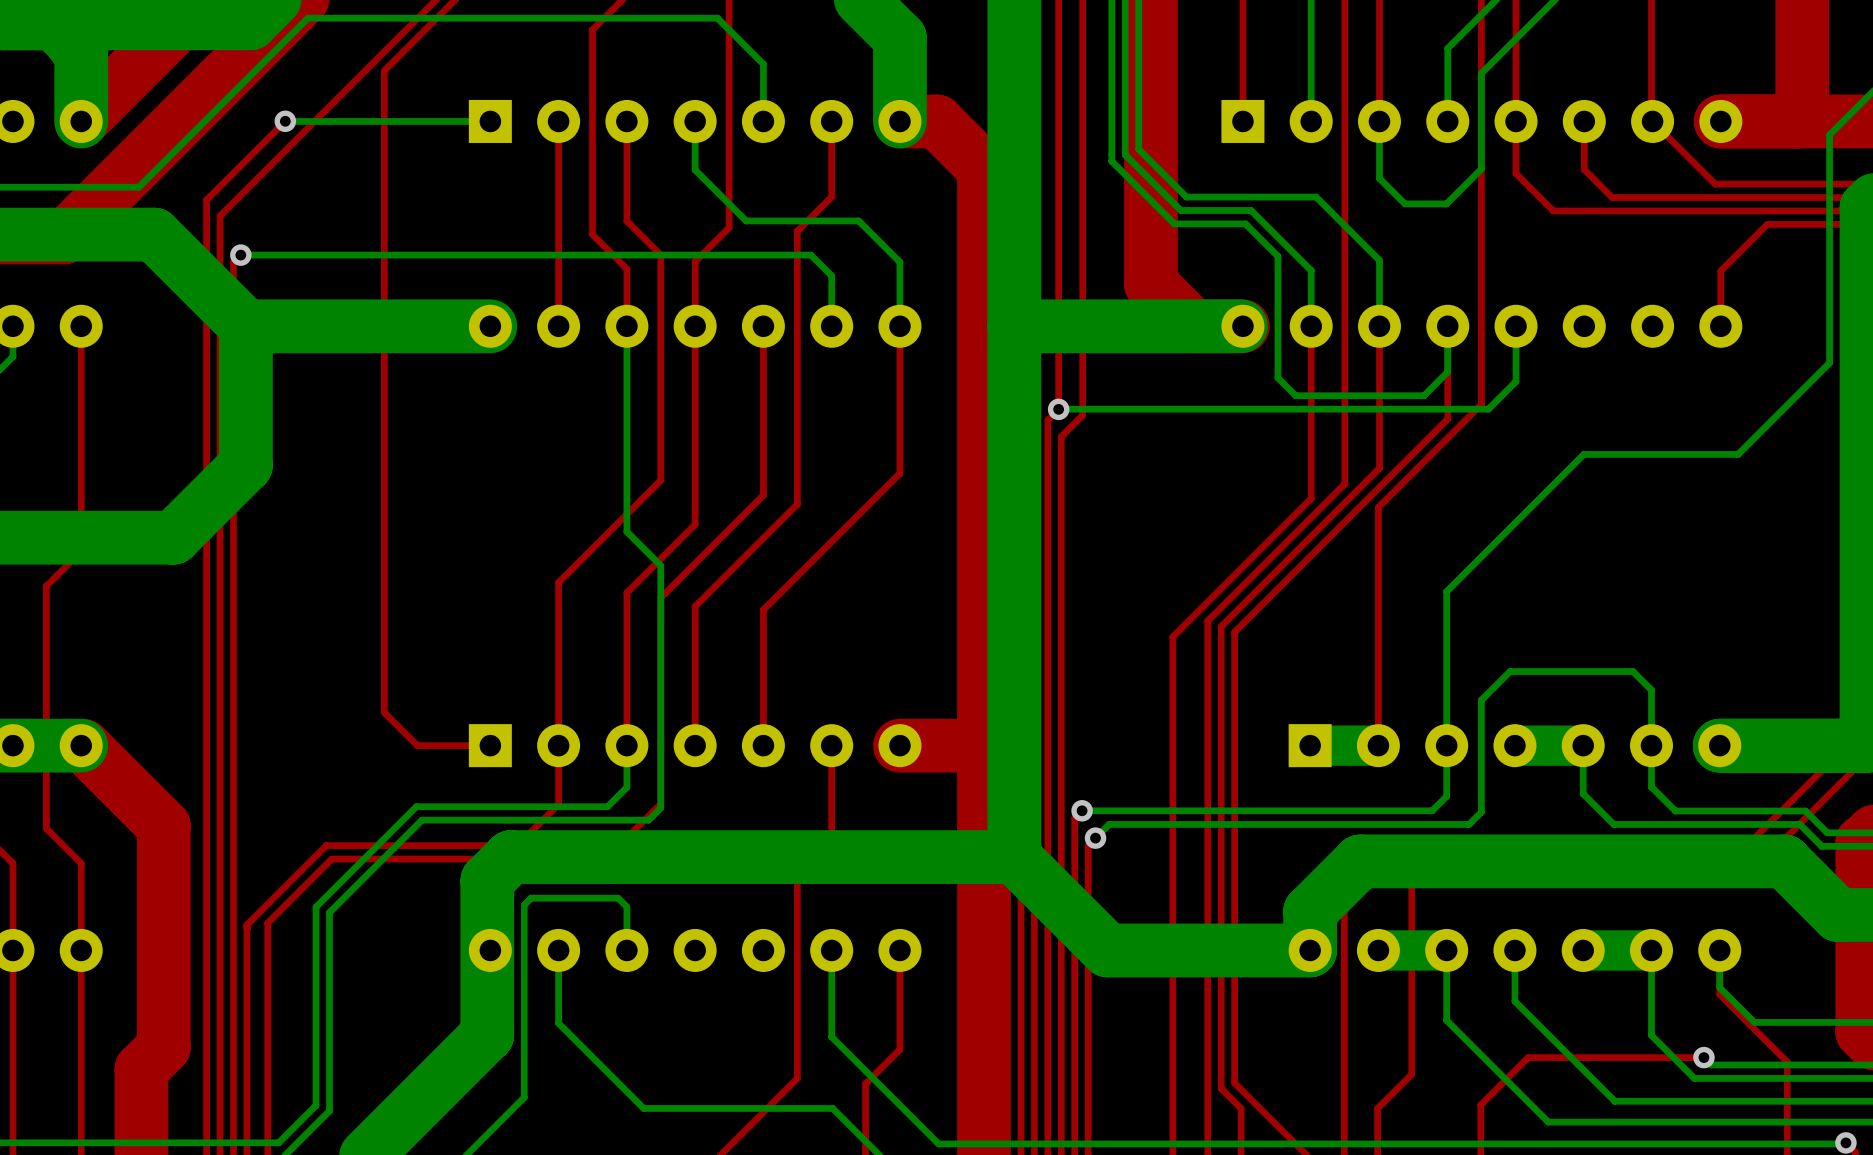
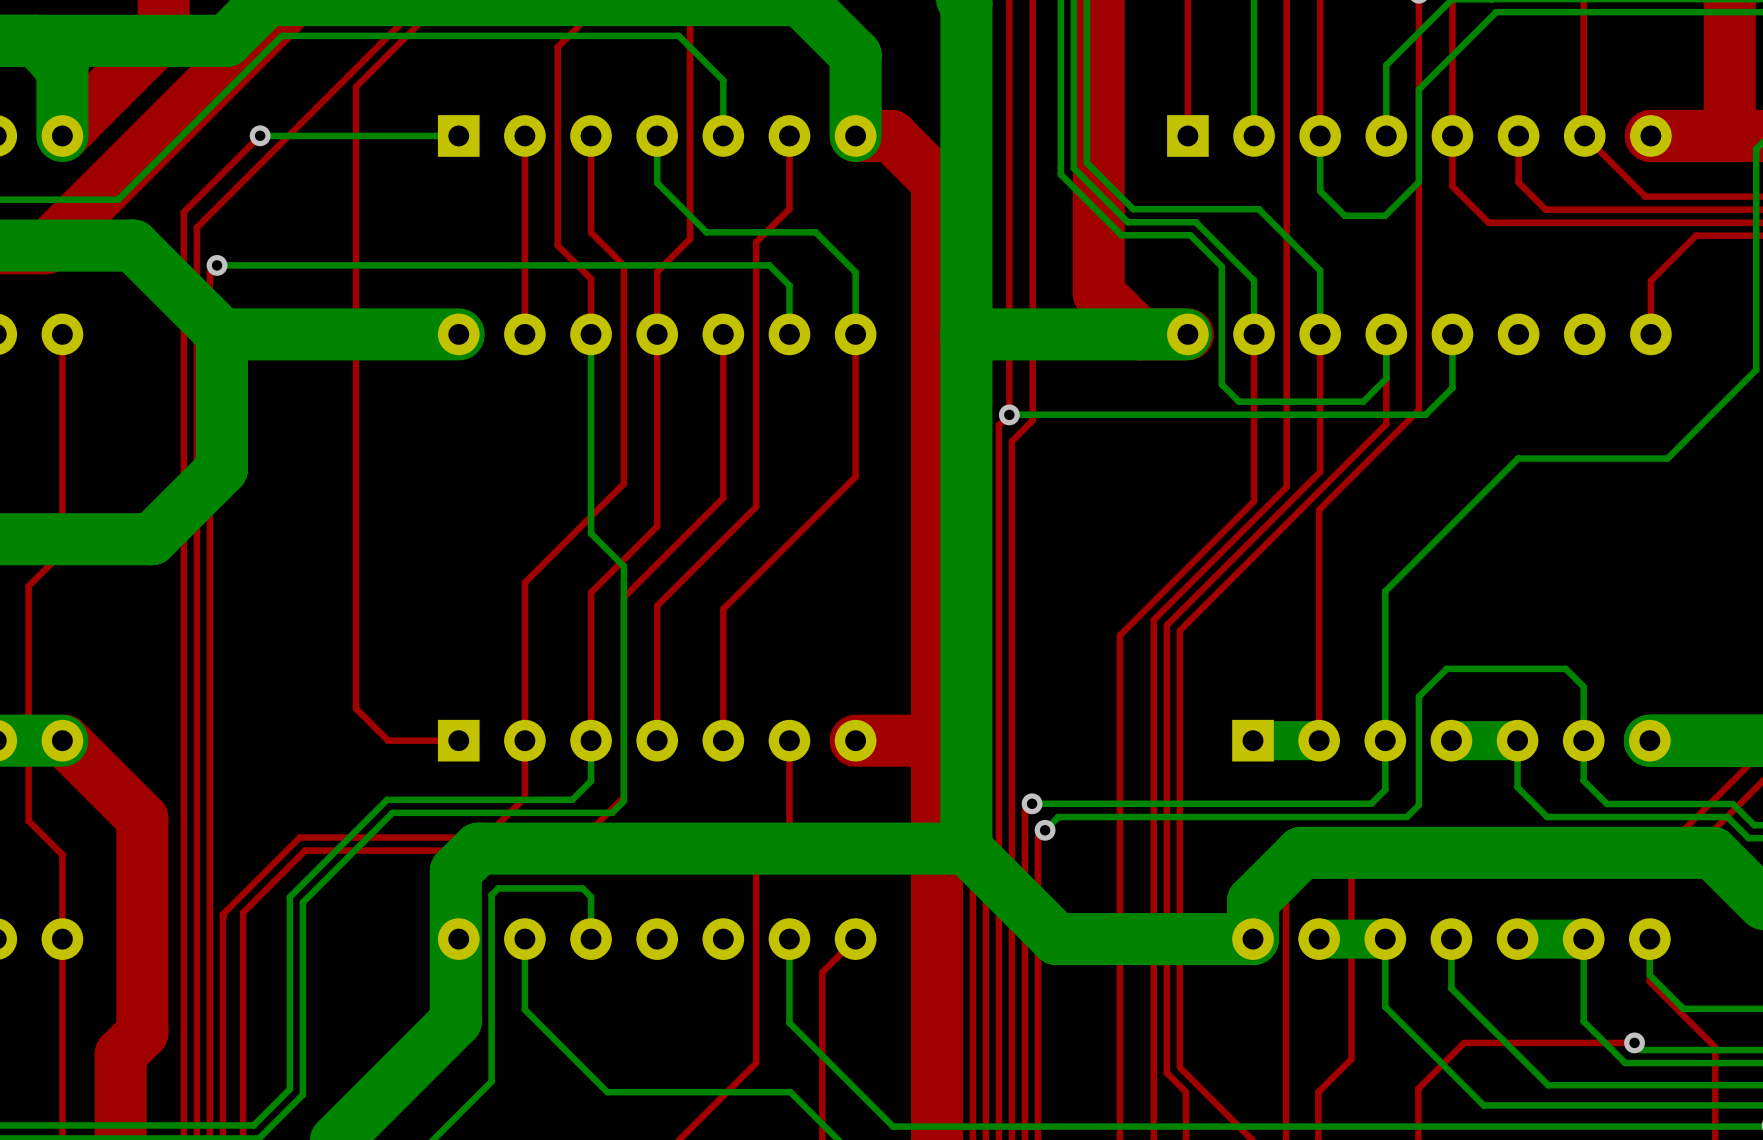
top track: (899, 950) (899, 1049) (865, 1083) -> (855, 939) (822, 972) (822, 1068)

